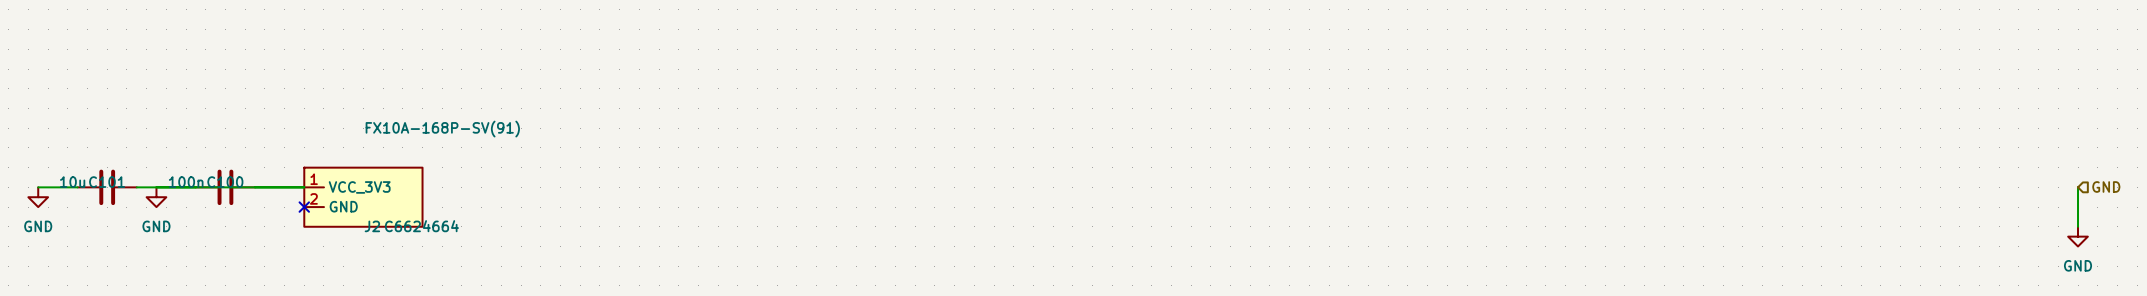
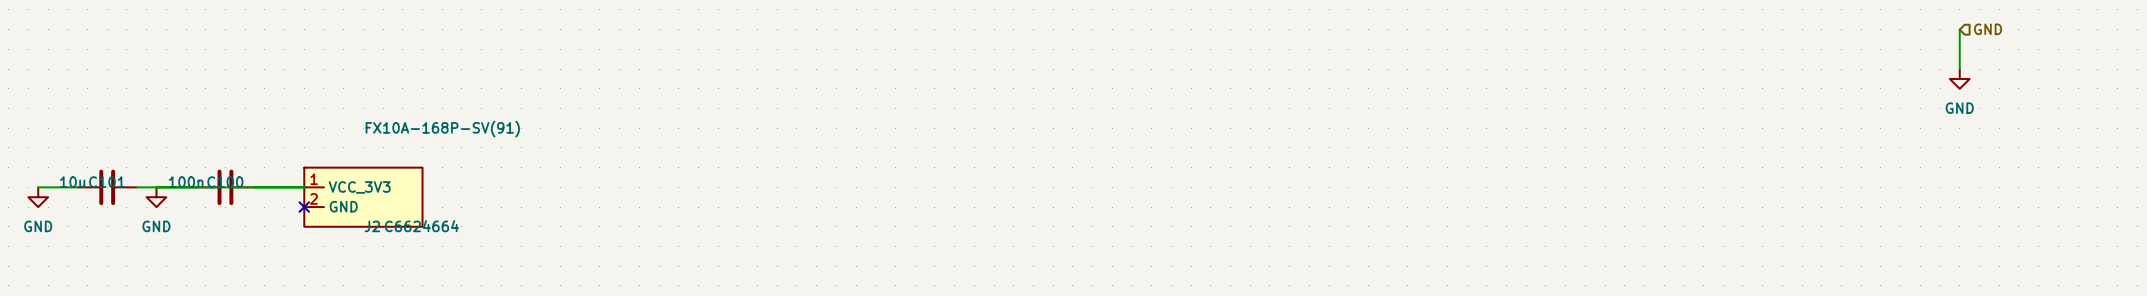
wire: none -> (1959, 29) (1959, 69)
hierarchical label: none -> GND (1988, 29)
power symbol: none -> GND (1959, 78)
hierarchical label: GND (2106, 186) -> none
wire: (2078, 187) (2078, 226) -> none
power symbol: GND (2078, 236) -> none

